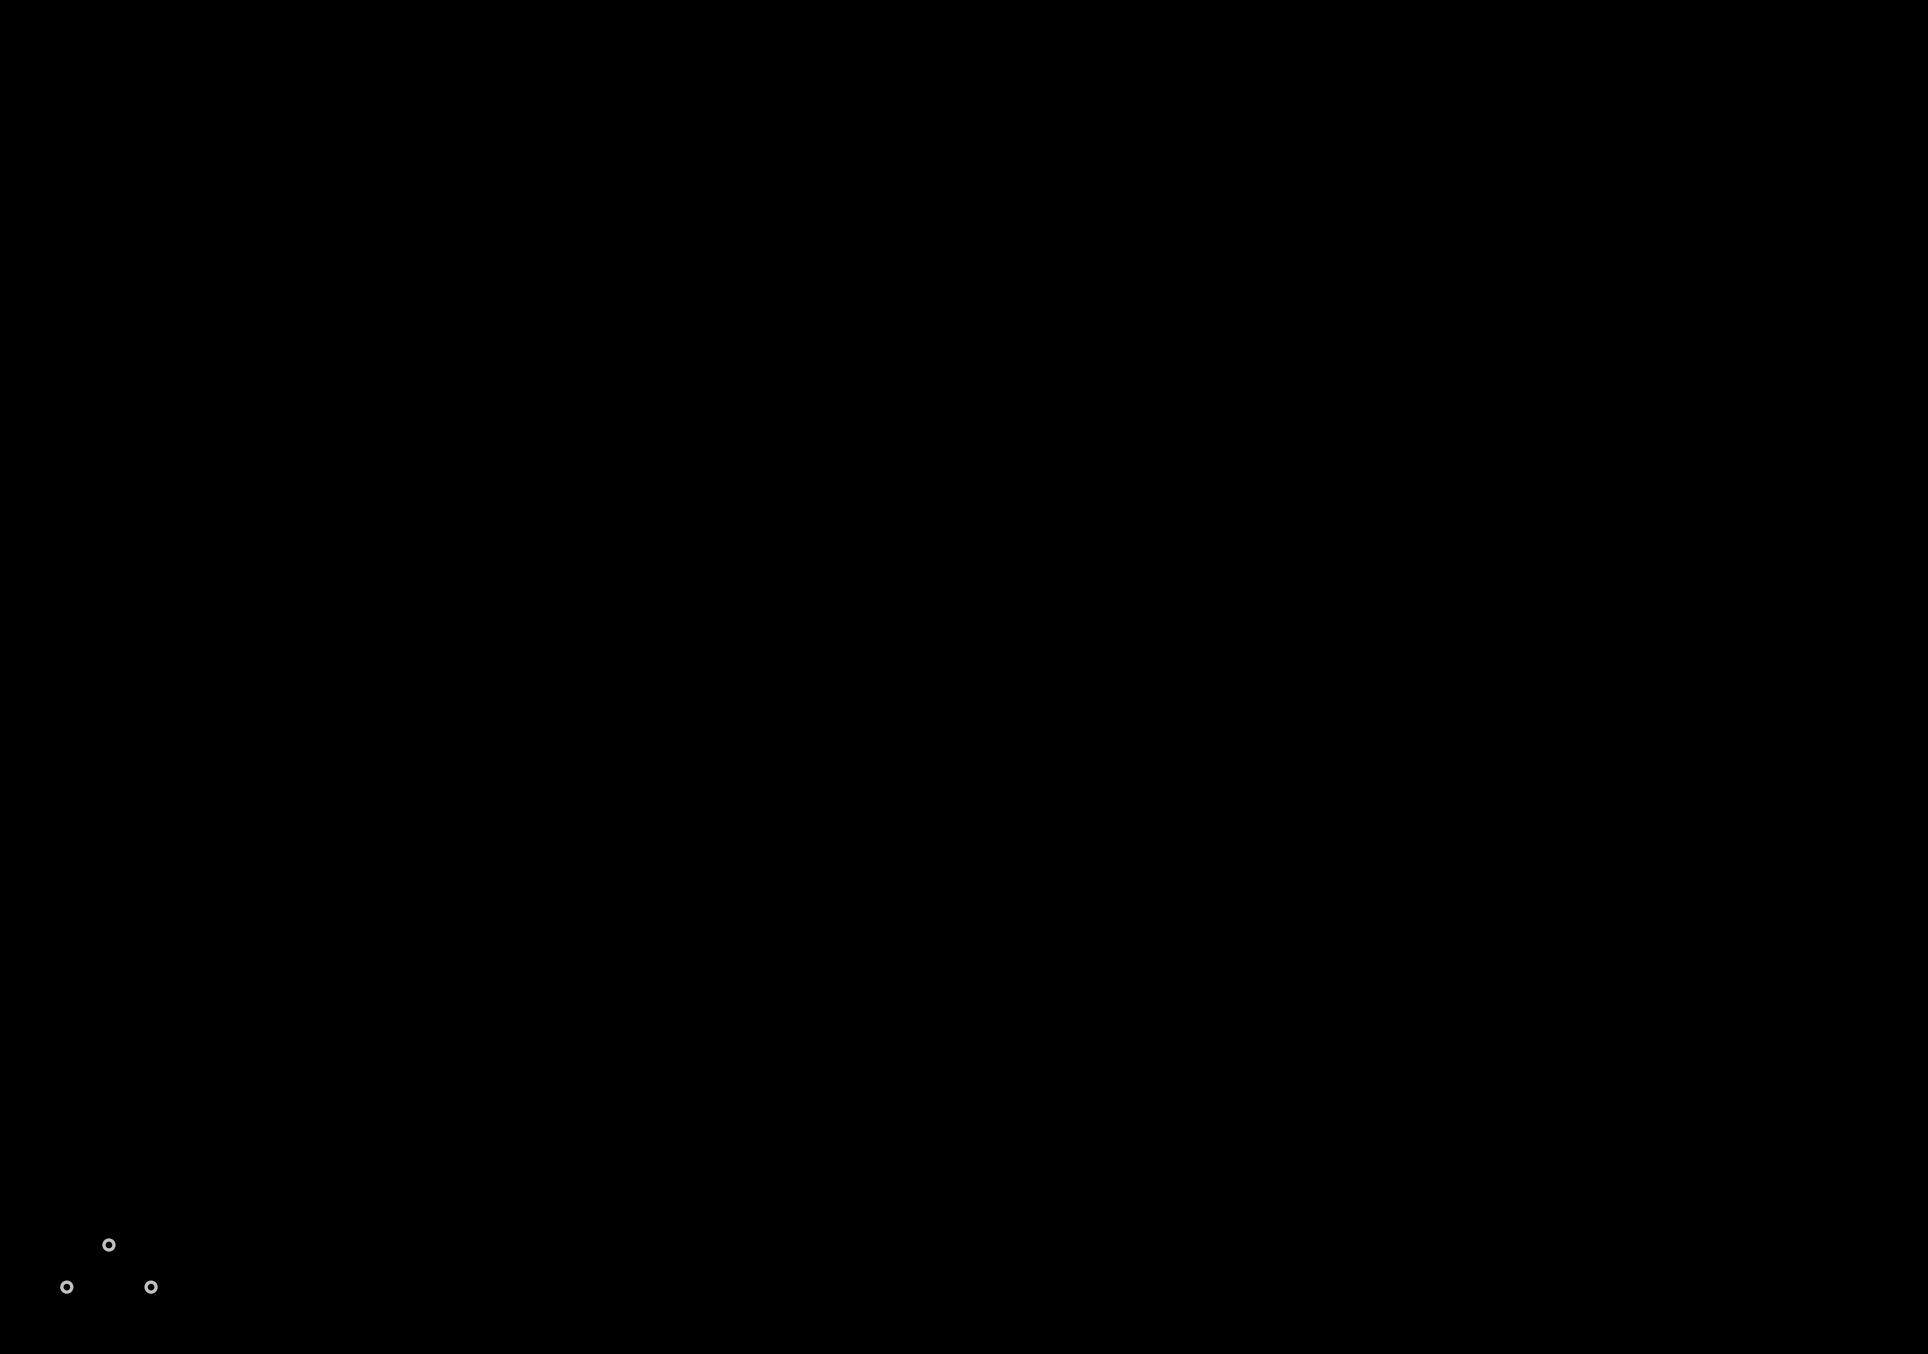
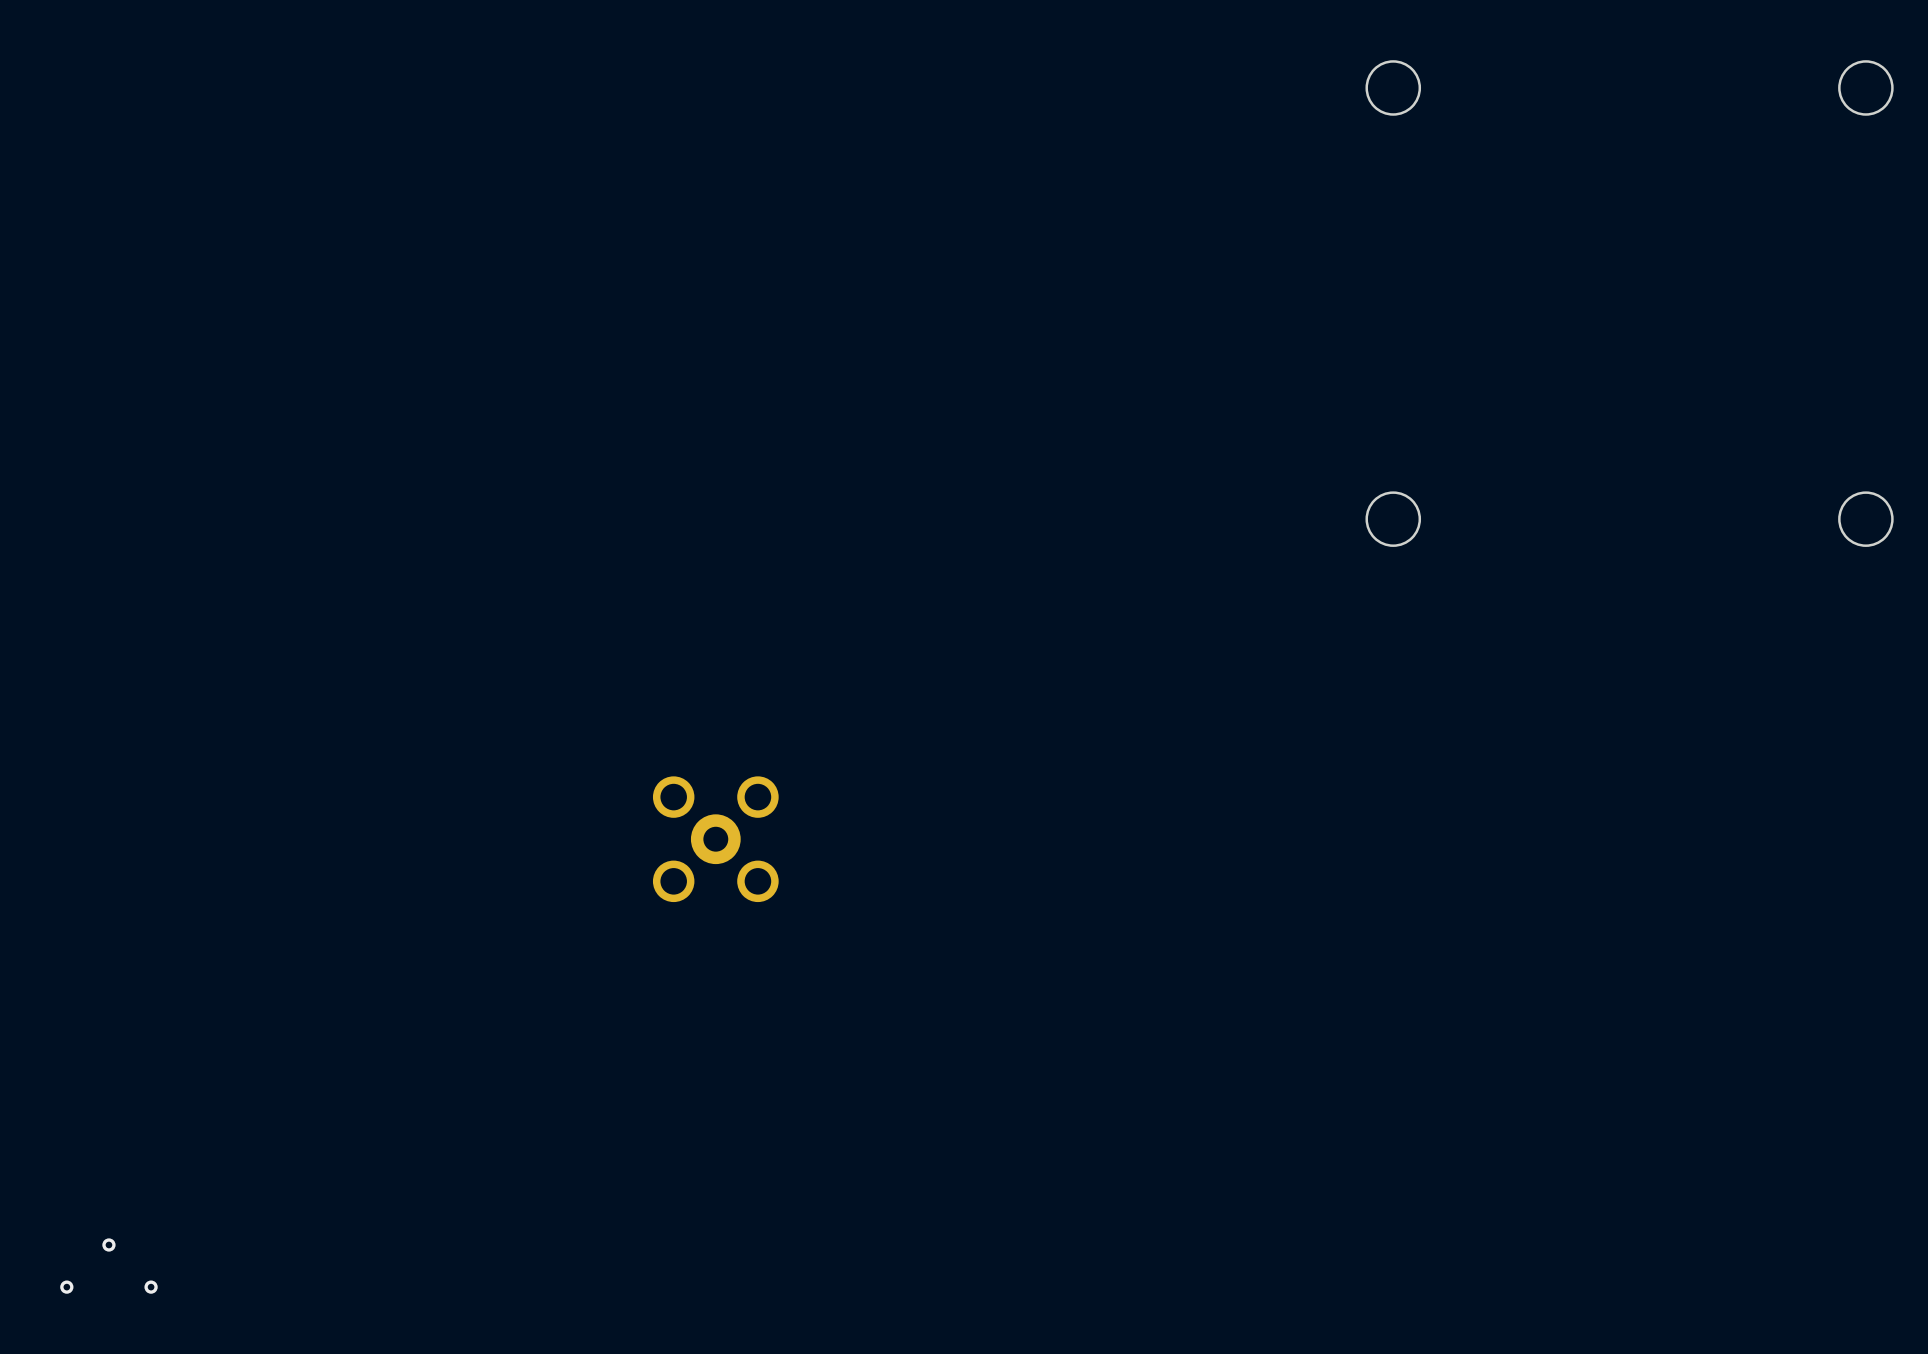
round board edge: none -> [1365, 60, 1422, 116]
round board edge: none -> [1838, 60, 1894, 116]
round board edge: none -> [1365, 491, 1422, 547]
round board edge: none -> [1838, 491, 1894, 547]
part: none -> (715, 839)

